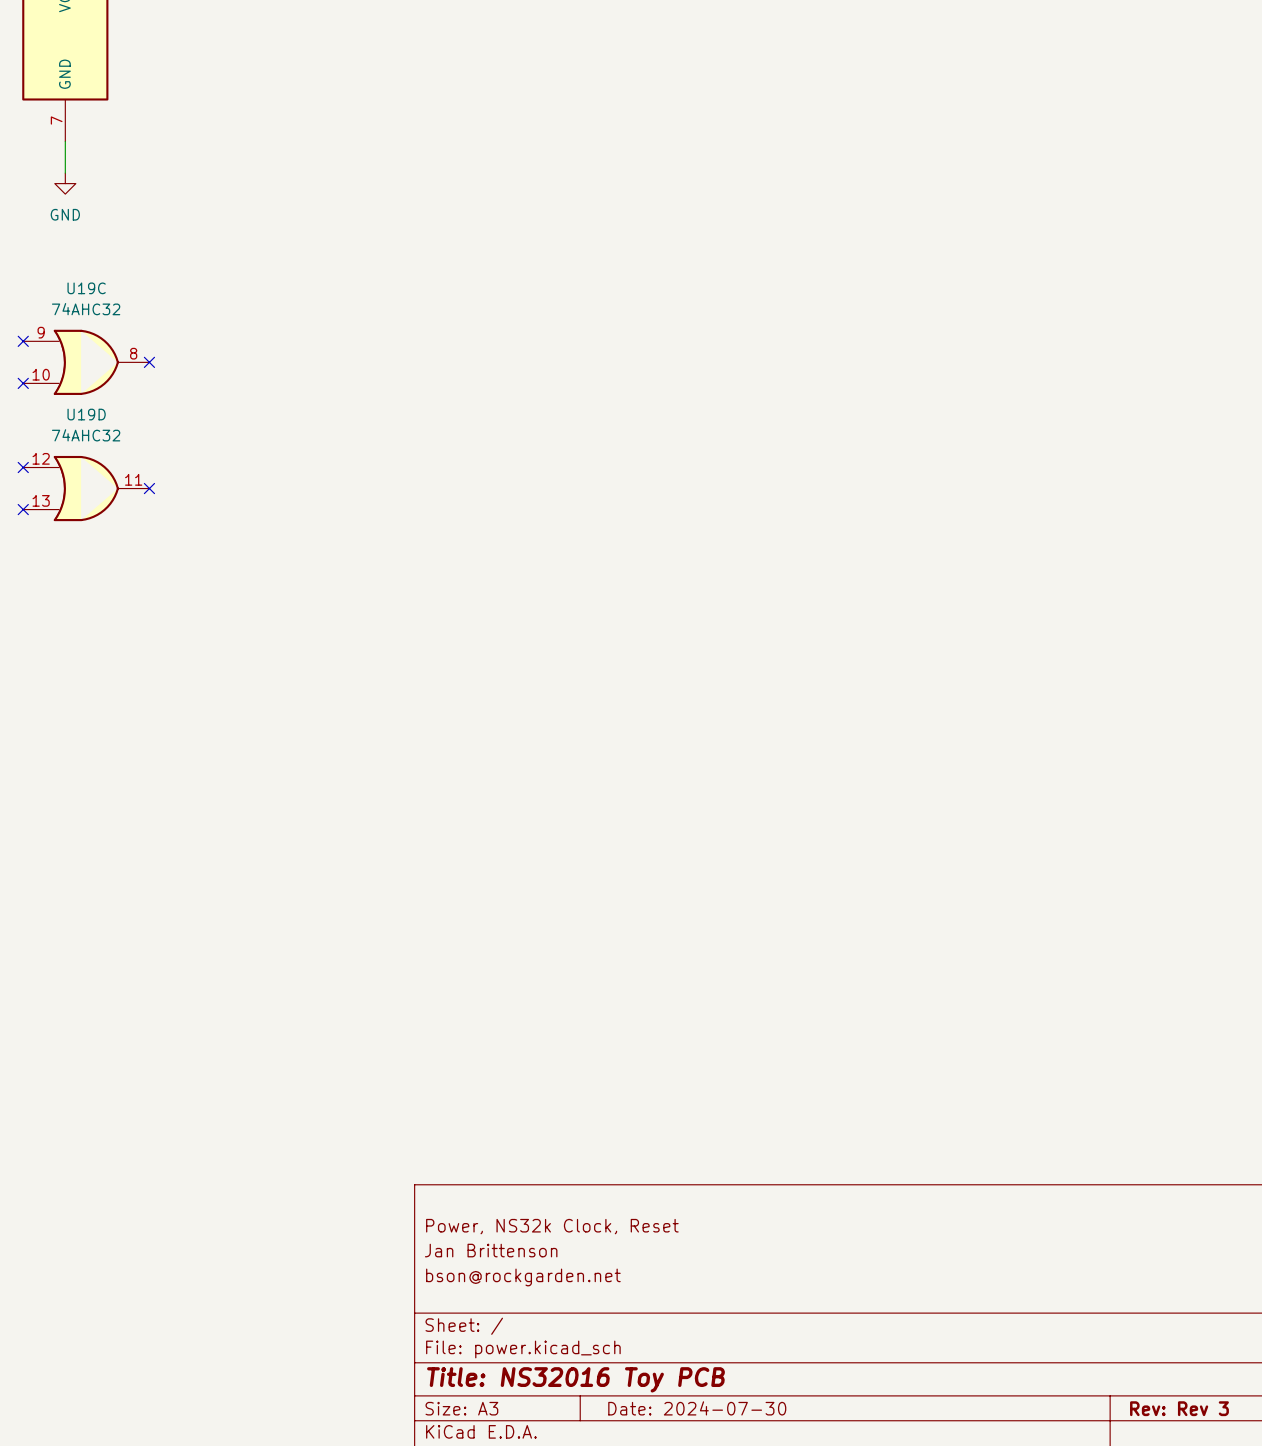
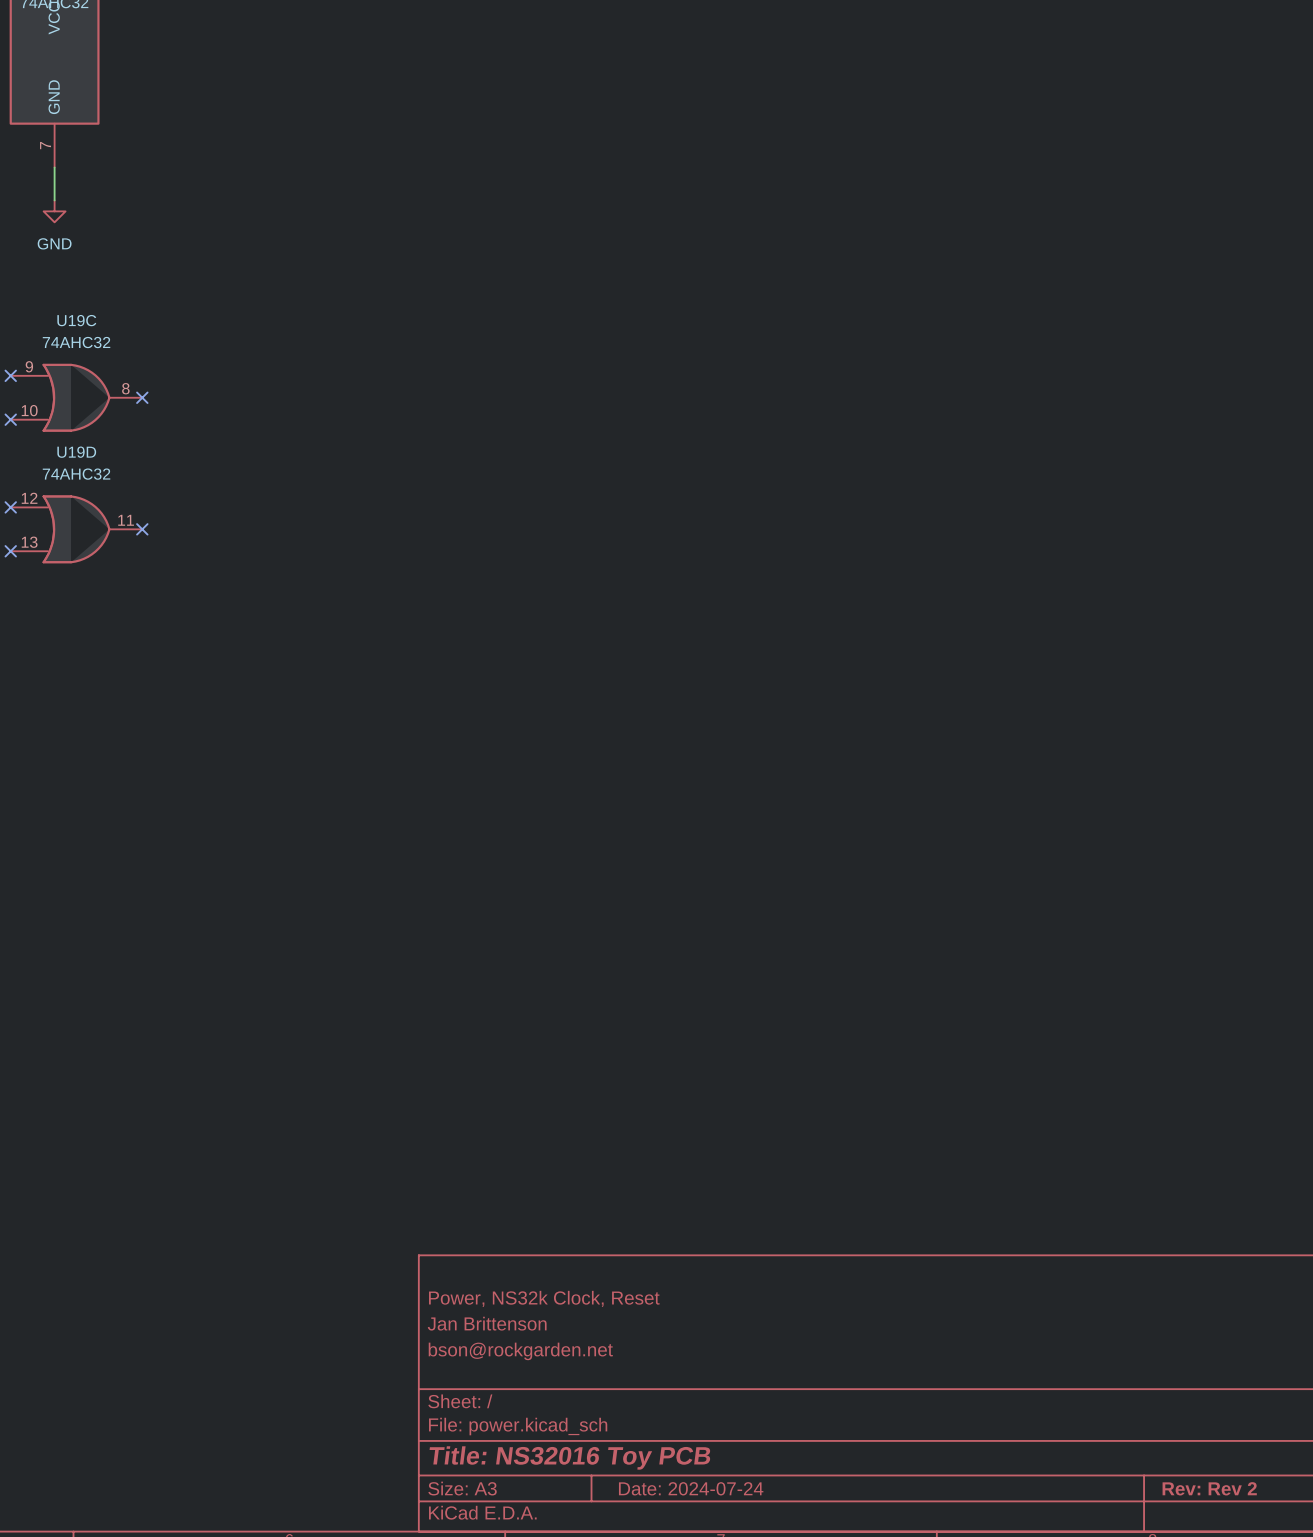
title block: Date: 2024-07-30 (697, 1408) -> Date: 2024-07-24 (691, 1488)
title block: Rev: Rev 3 (1179, 1408) -> Rev: Rev 2 (1209, 1488)

